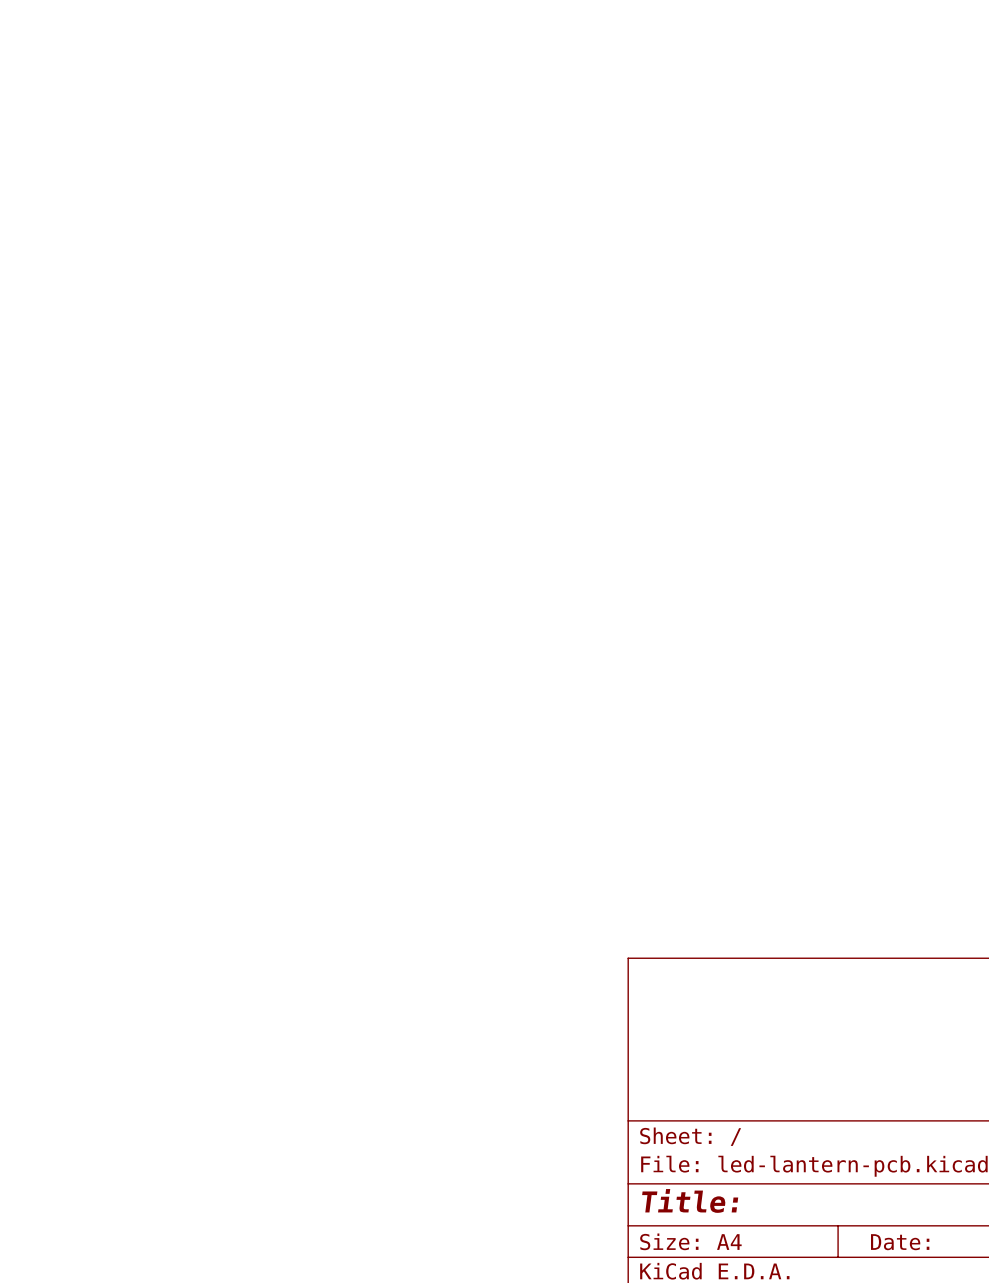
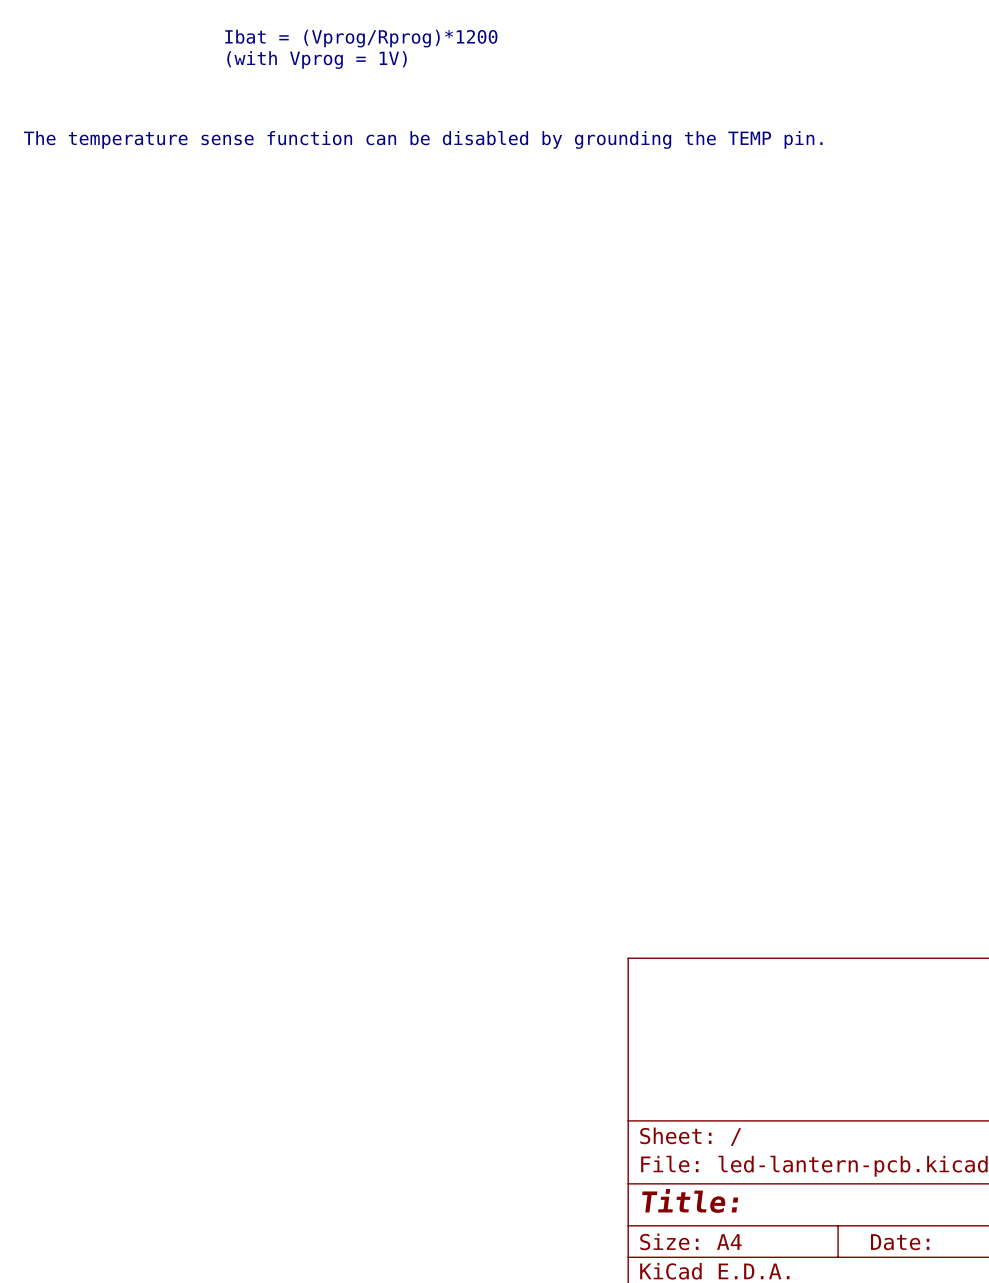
text: none -> Ibat = (Vprog/Rprog)*1200 (361, 38)
text: none -> (with Vprog = 1V) (317, 60)
text: none -> The temperature sense function can be disabled by grounding the TEMP pin. (423, 139)

